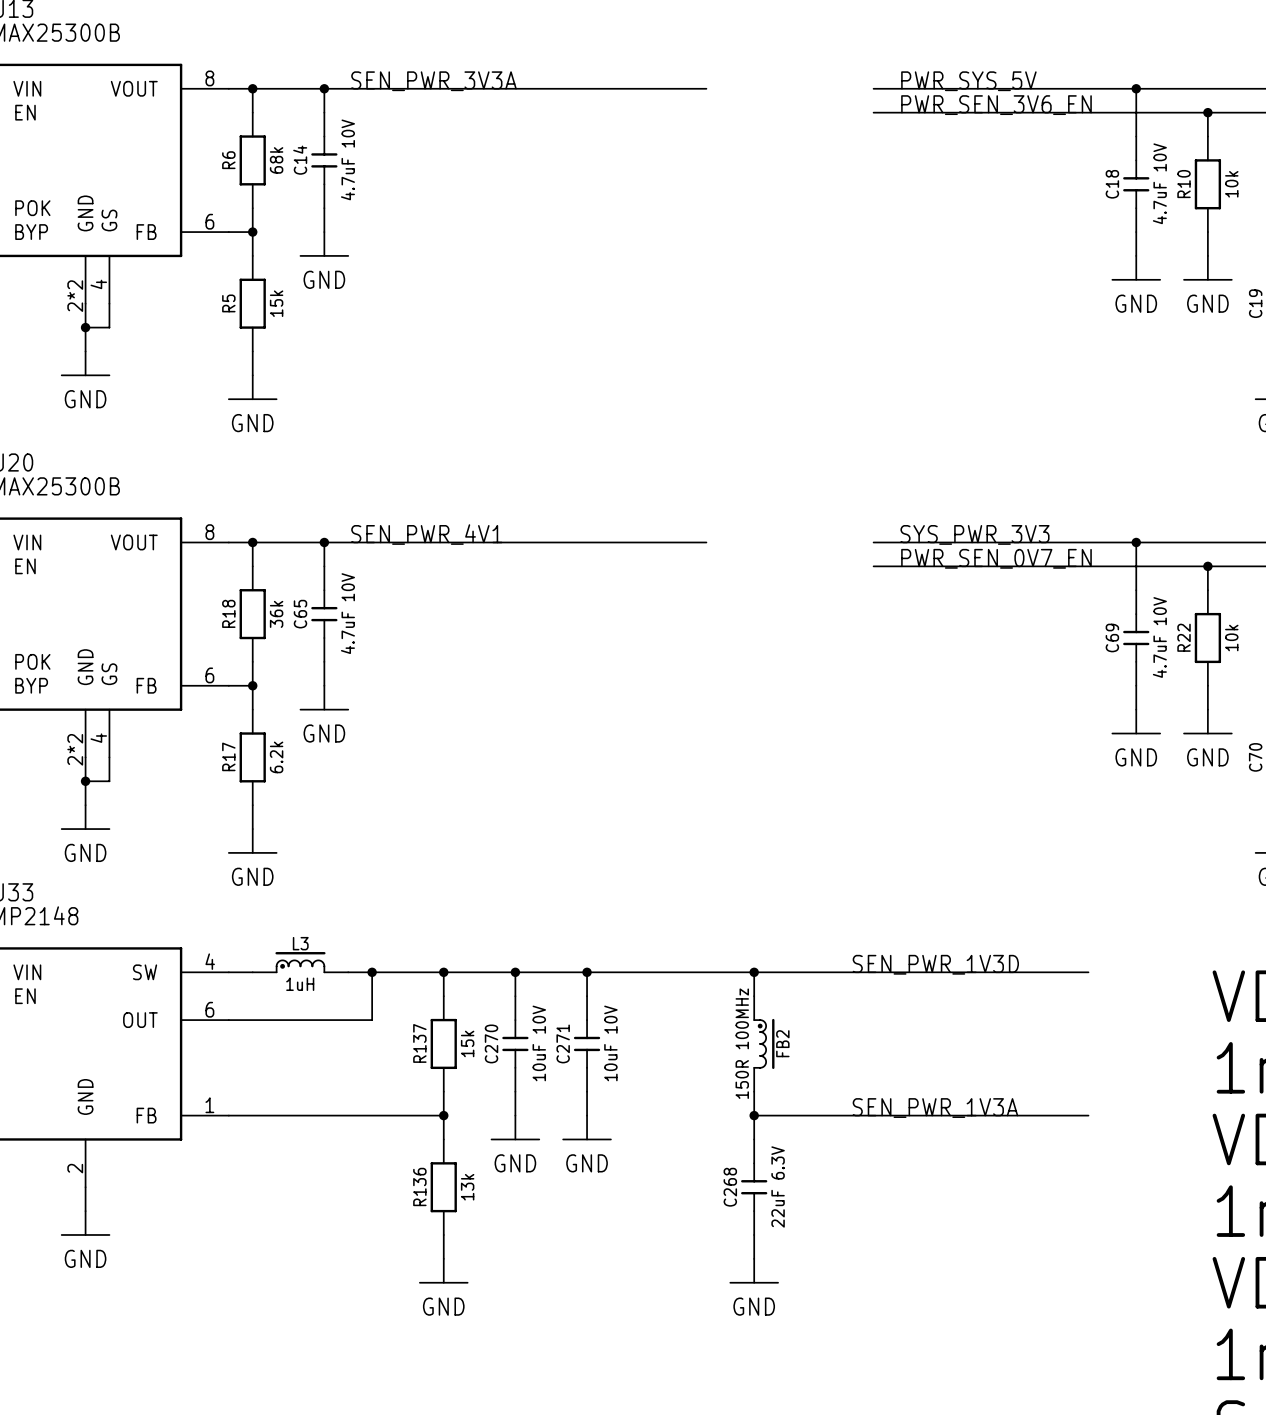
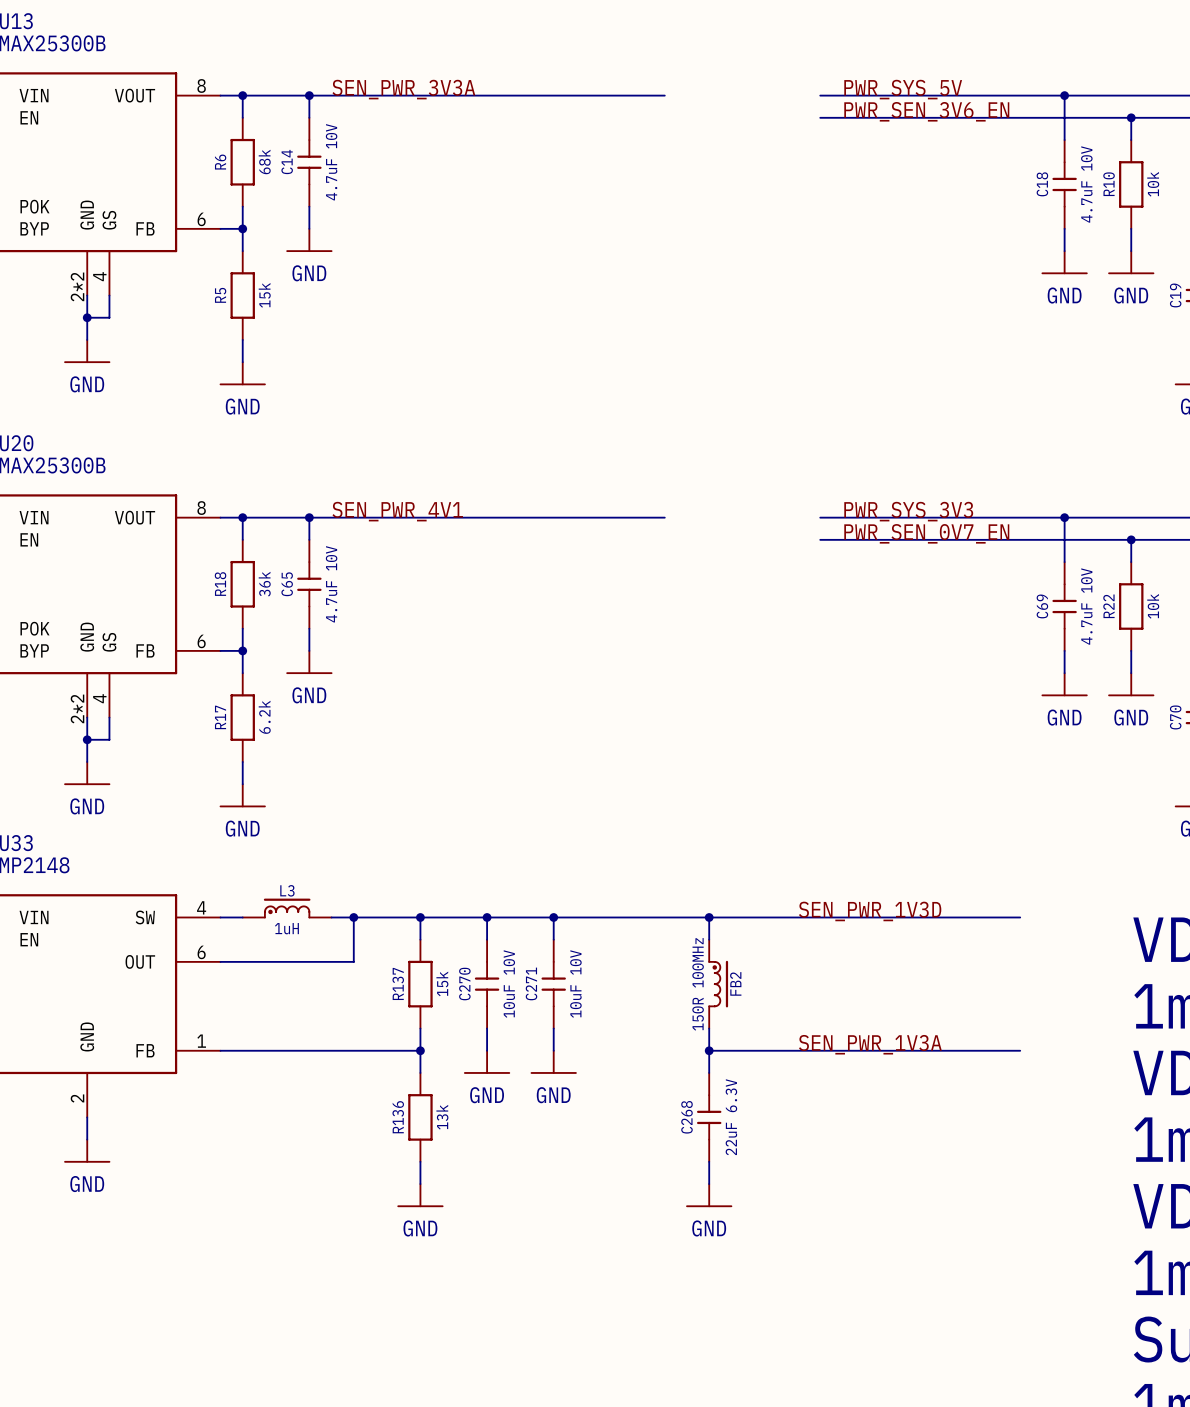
label: SYS_PWR_3V3 (975, 534) -> PWR_SYS_3V3 (908, 511)

